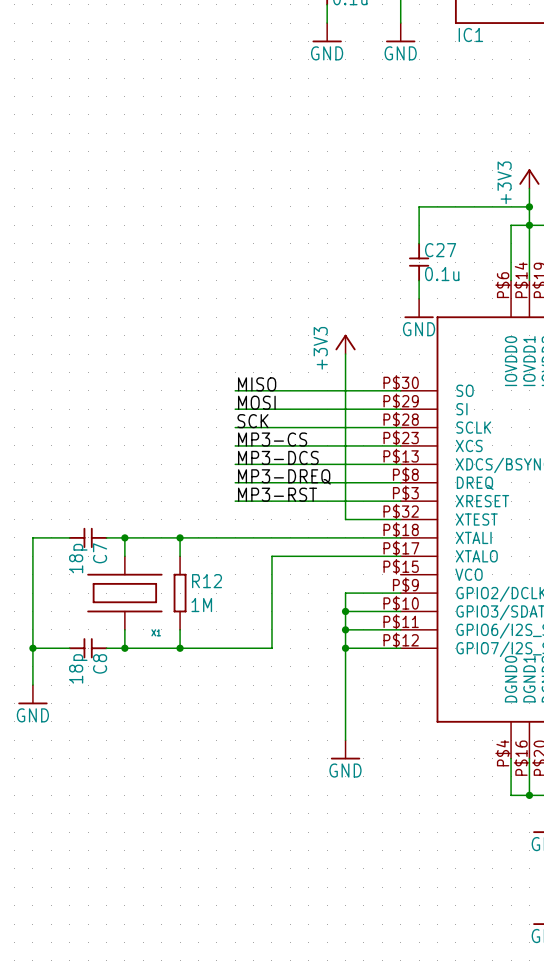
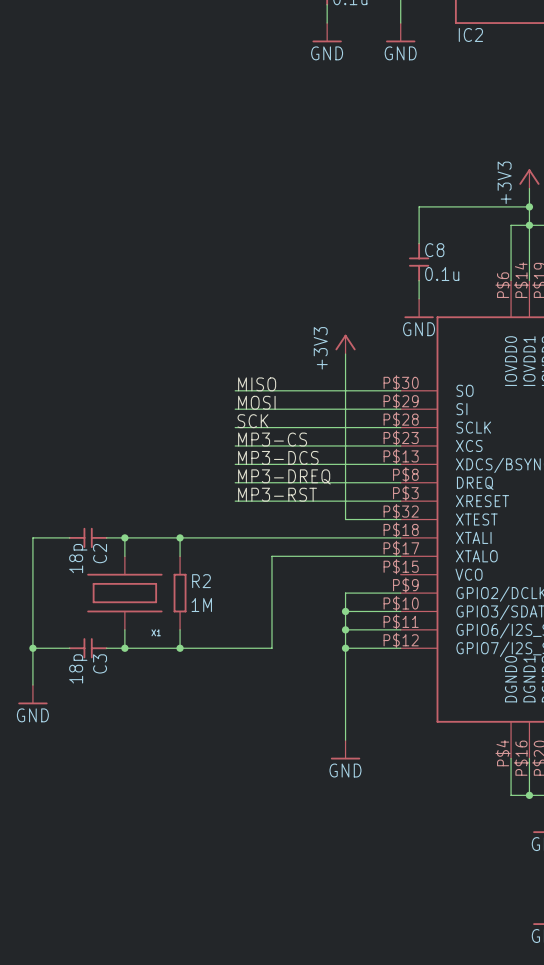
IC1 name: IC1 (470, 34) -> IC2 (470, 34)
C27 name: C27 (440, 250) -> C8 (434, 250)
C7 name: C7 (100, 553) -> C2 (100, 553)
R12 name: R12 (207, 581) -> R2 (201, 581)
C8 name: C8 (100, 663) -> C3 (100, 663)

